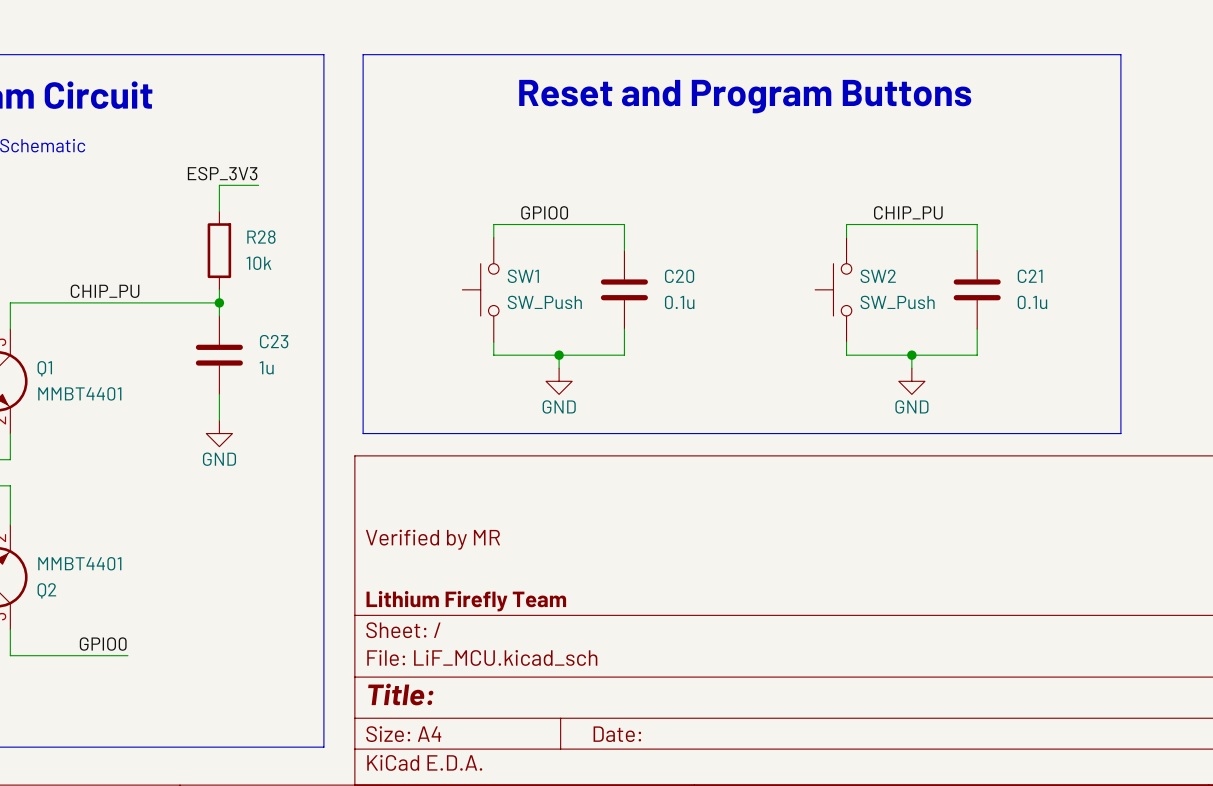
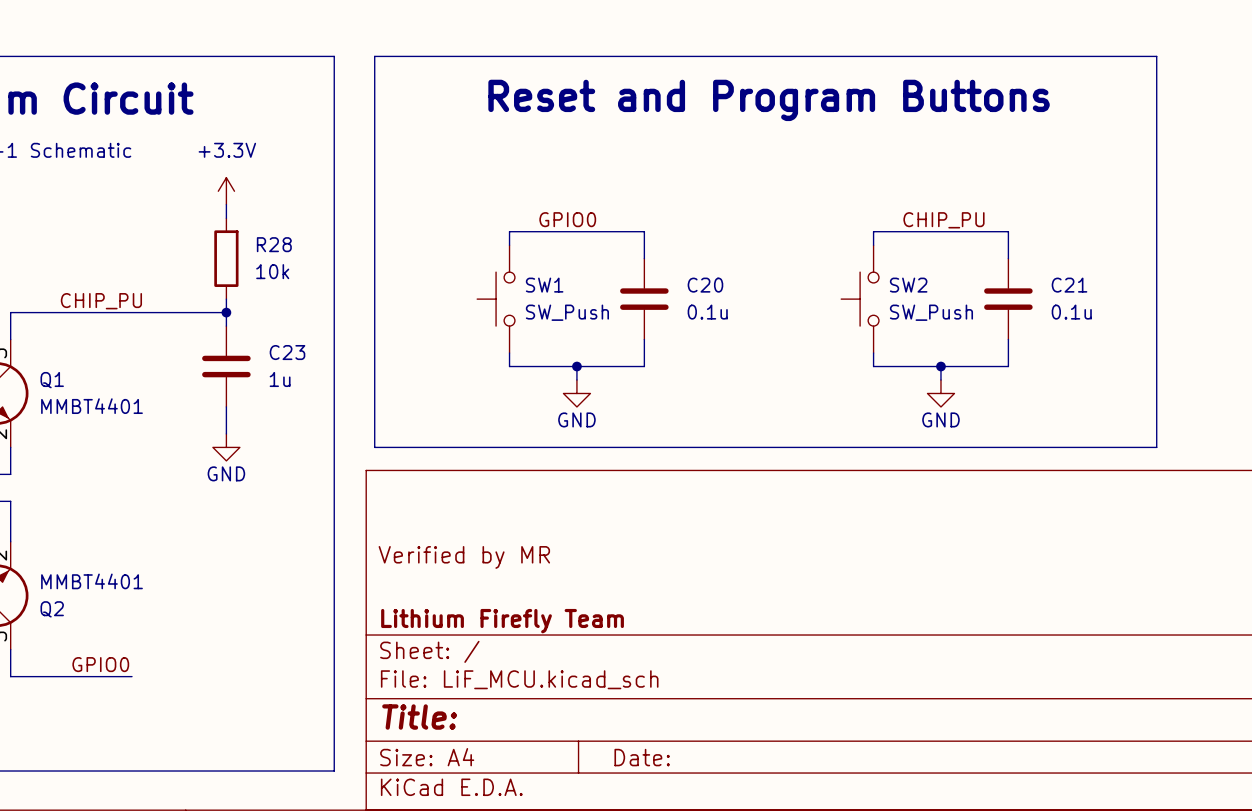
label: ESP_3V3 (222, 173) -> none
power symbol: none -> +3.3V (226, 191)
wire: (258, 185) (219, 185) (219, 198) -> none

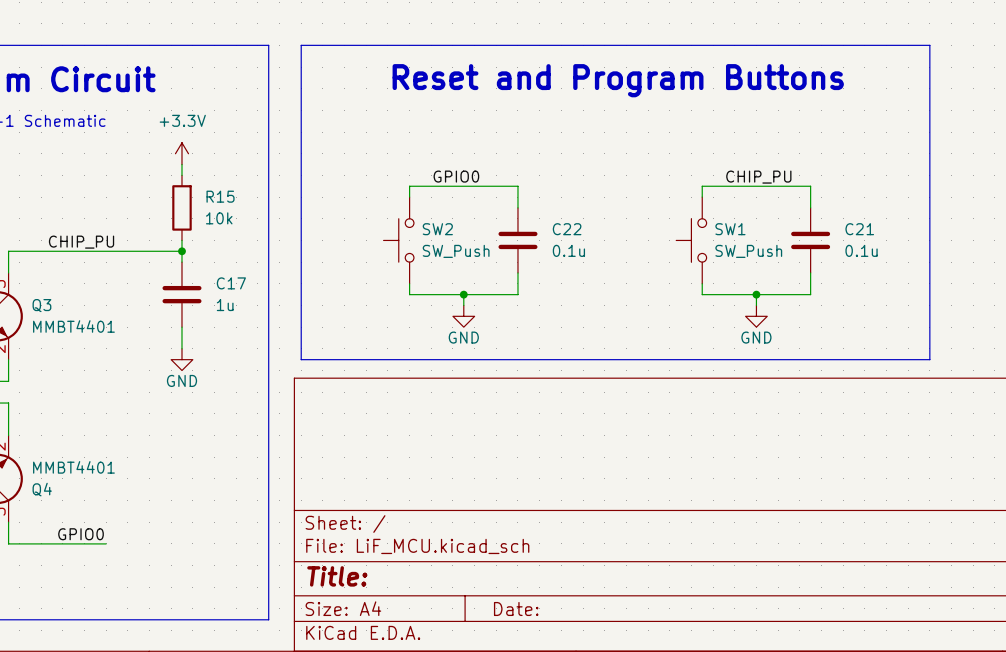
R28 name: R28 (274, 244) -> R15 (220, 196)
SW1 name: SW1 (544, 285) -> SW2 (437, 229)
C20 name: C20 (705, 285) -> C22 (567, 229)
SW2 name: SW2 (908, 285) -> SW1 (730, 229)
C23 name: C23 (287, 352) -> C17 (231, 283)
Q1 name: Q1 (52, 380) -> Q3 (41, 305)
title block: Verified by MR (464, 557) -> none
Q2 name: Q2 (52, 609) -> Q4 (42, 489)
title block: Lithium Firefly Team (502, 621) -> none

